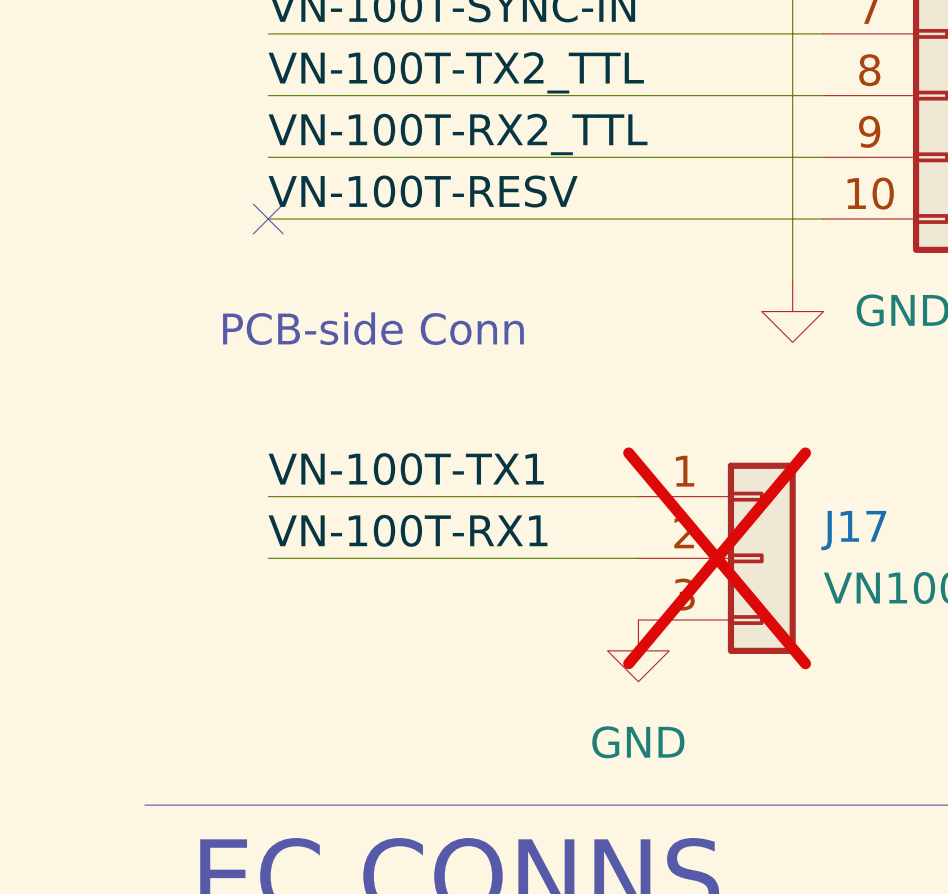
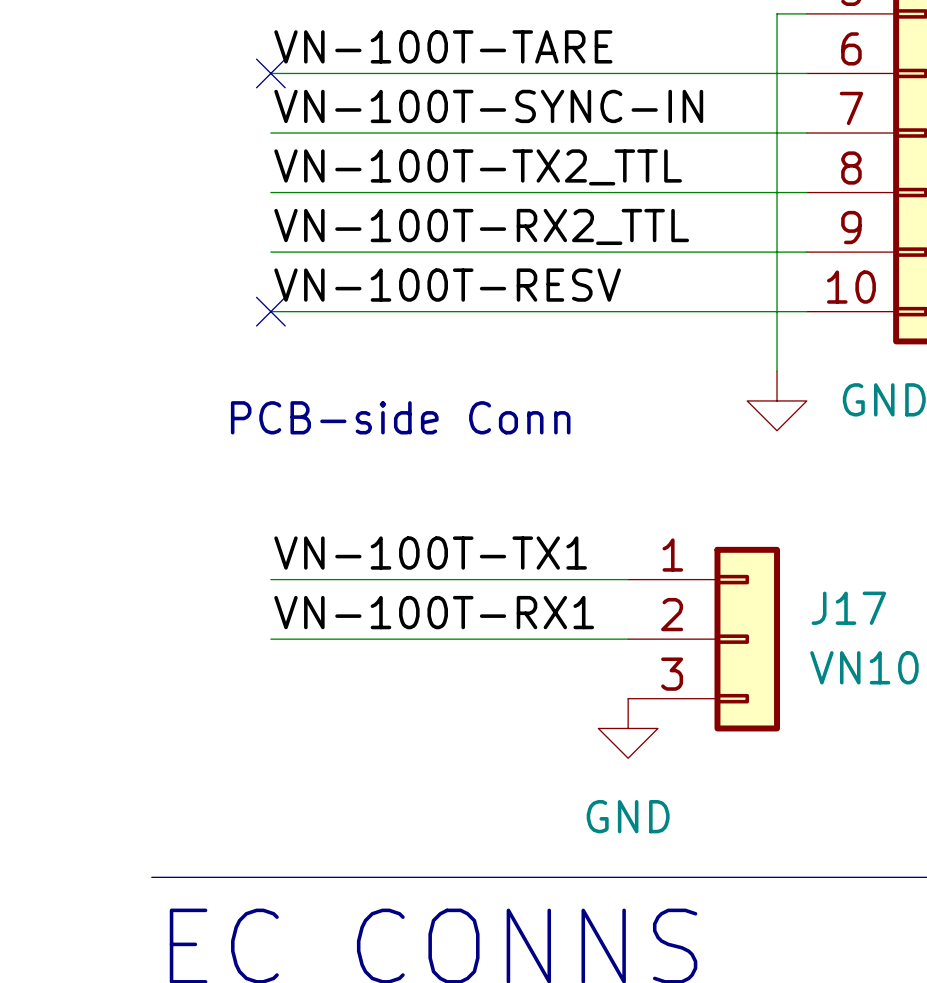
J17 do-not-place cross: (717, 558) -> none

